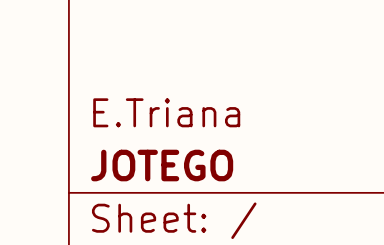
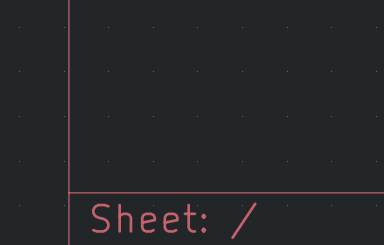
title block: E.Triana (166, 112) -> none
title block: JOTEGO (162, 165) -> none

